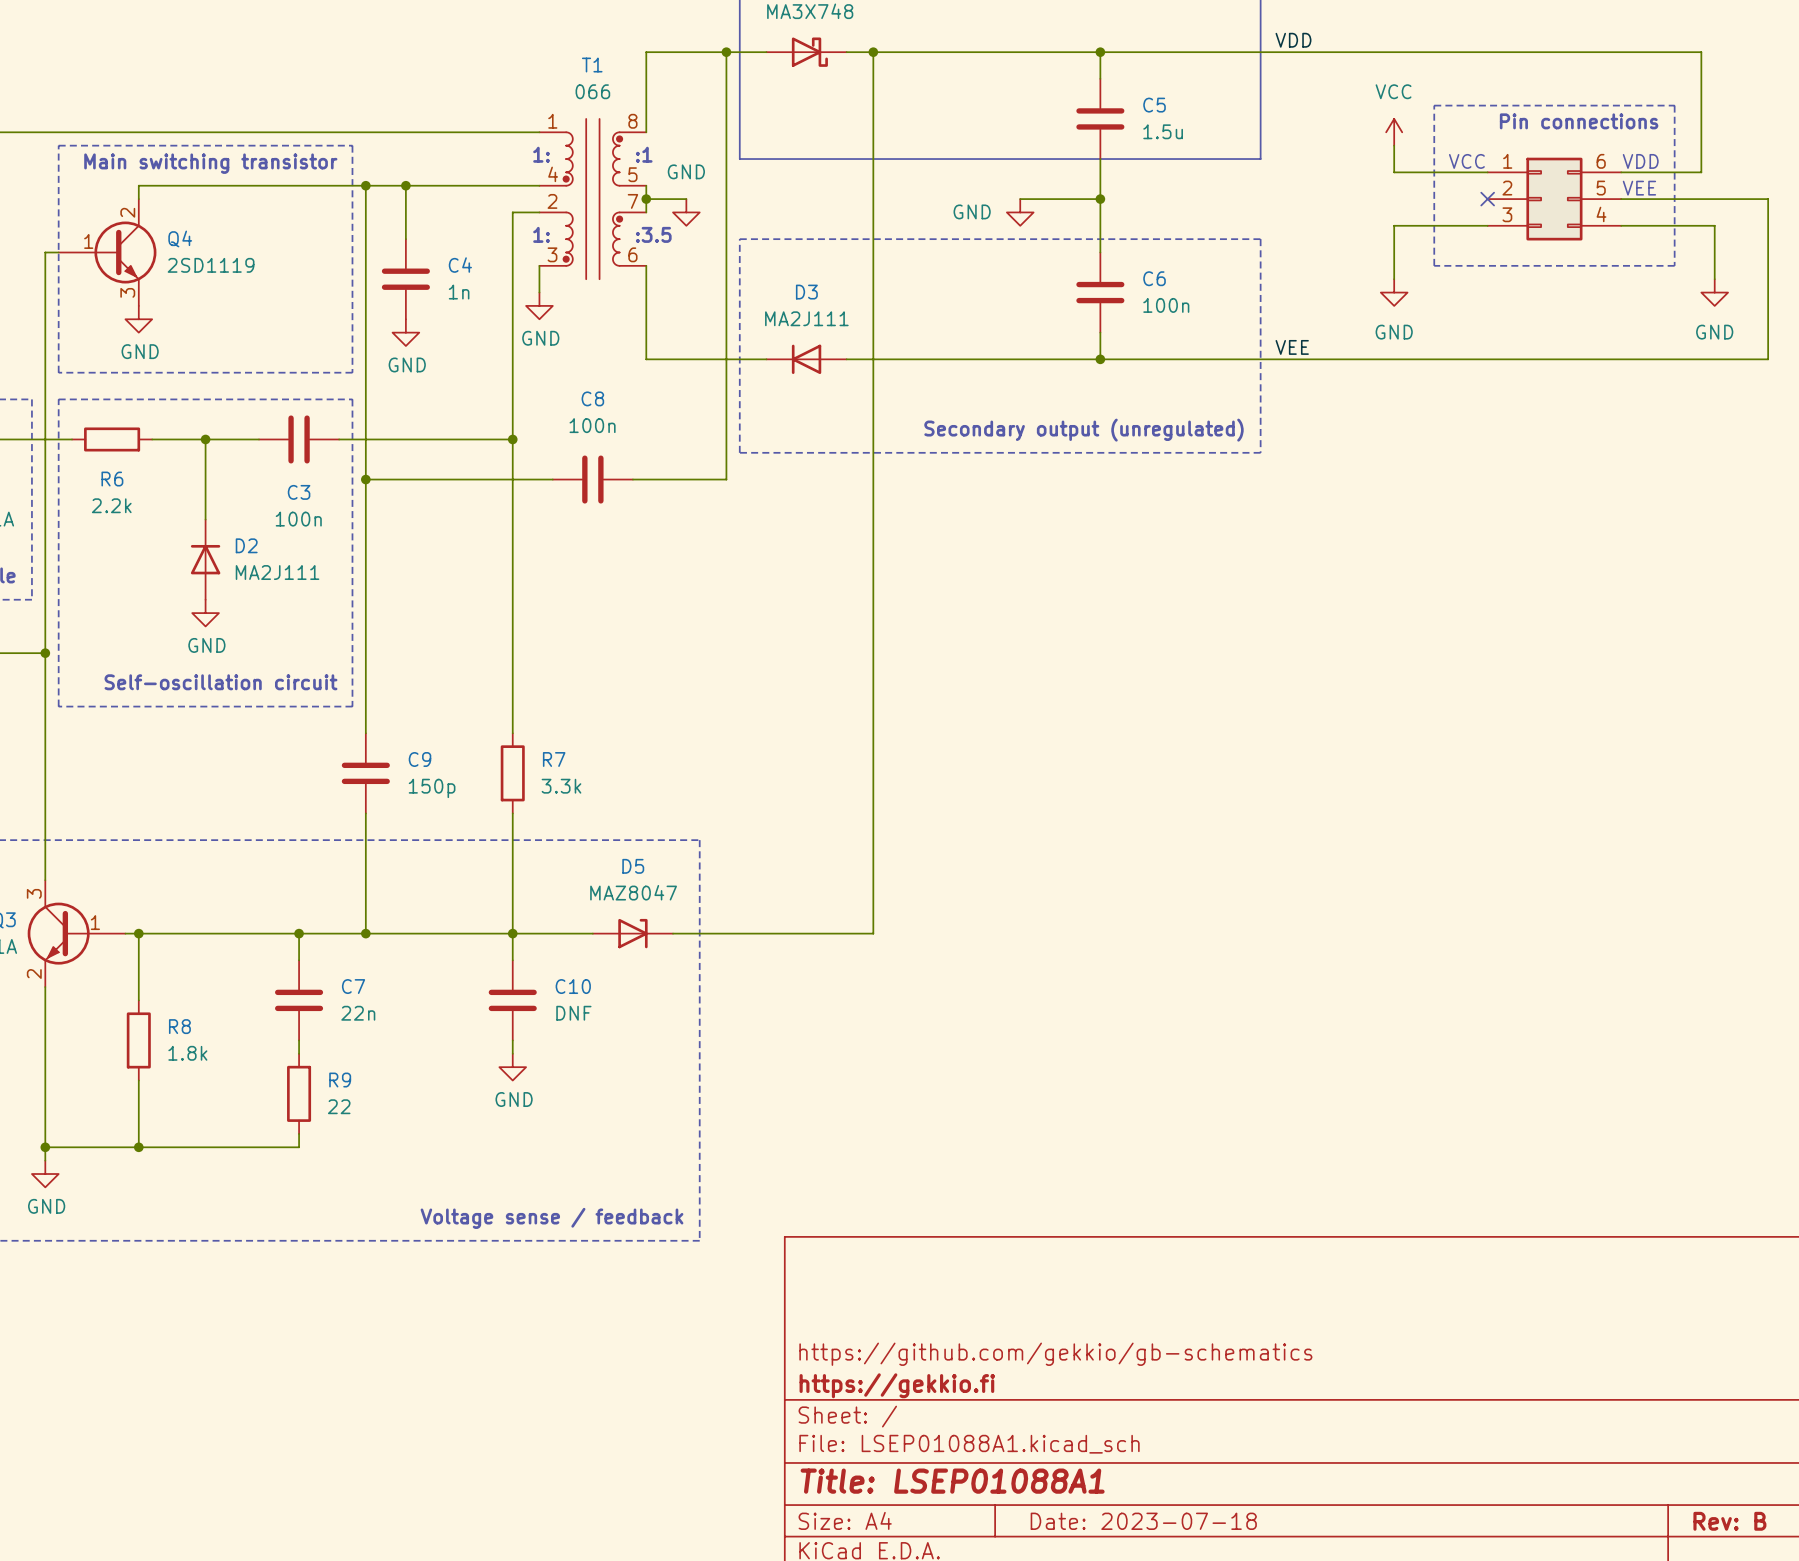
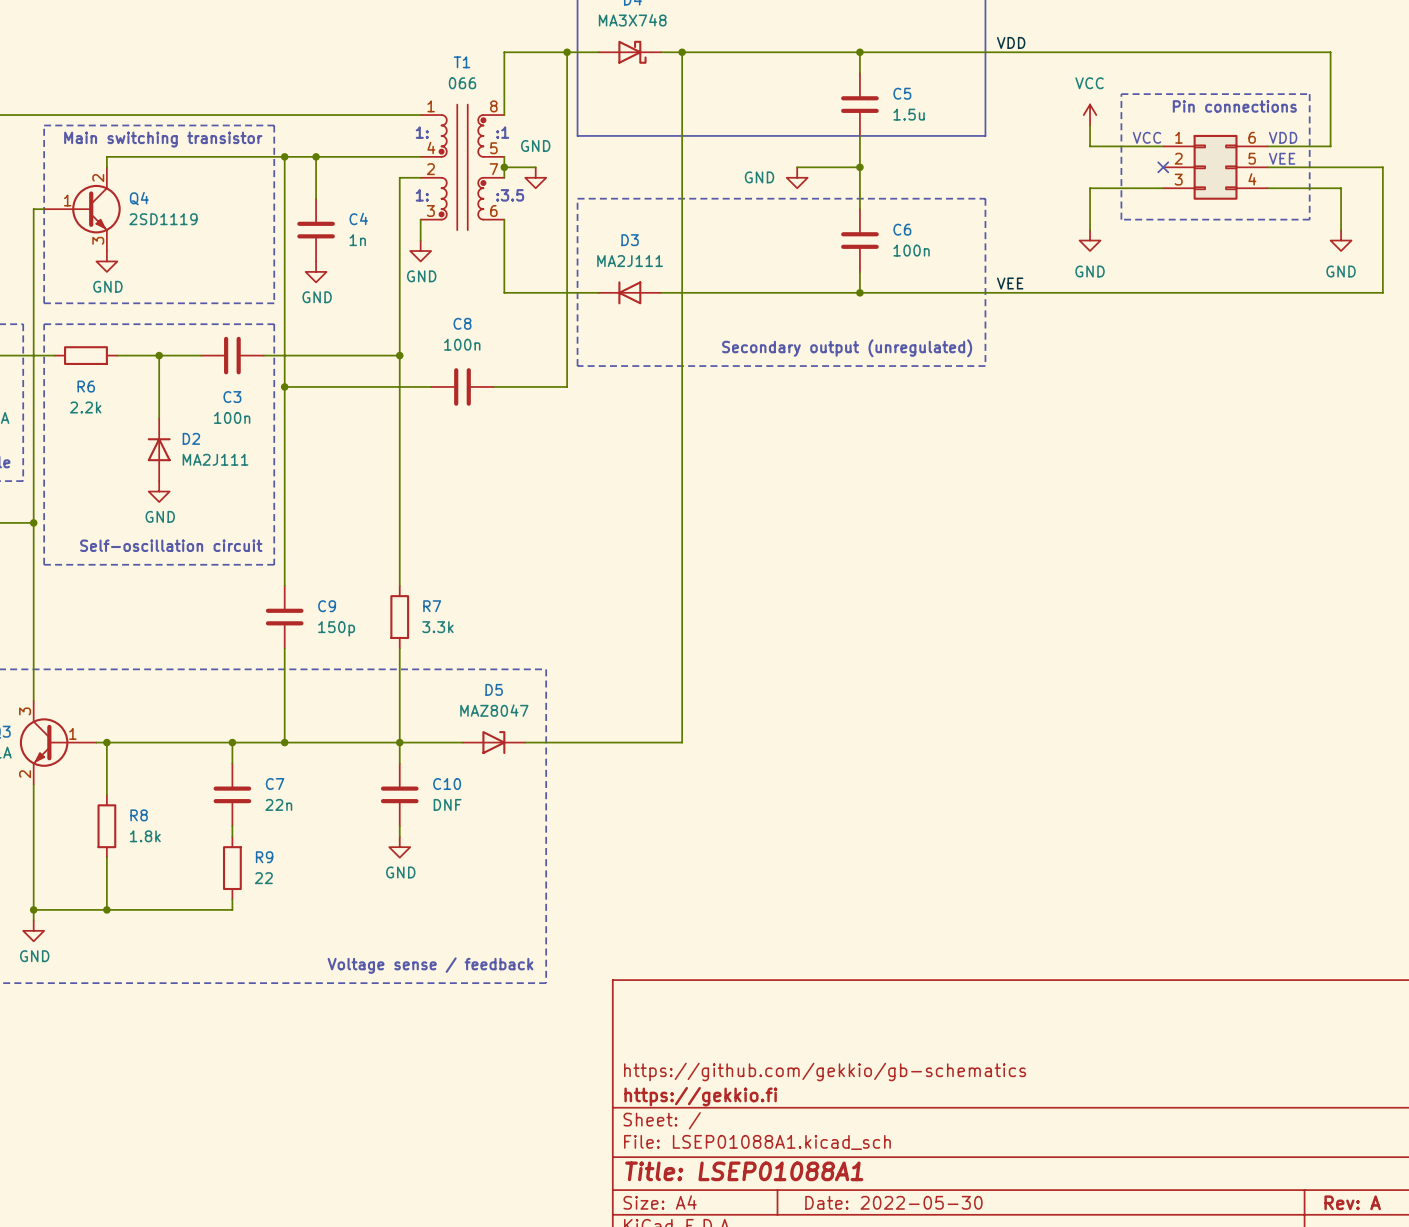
title block: Date: 2023-07-18 (1143, 1521) -> Date: 2022-05-30 (893, 1202)
title block: Rev: B (1729, 1521) -> Rev: A (1352, 1202)

